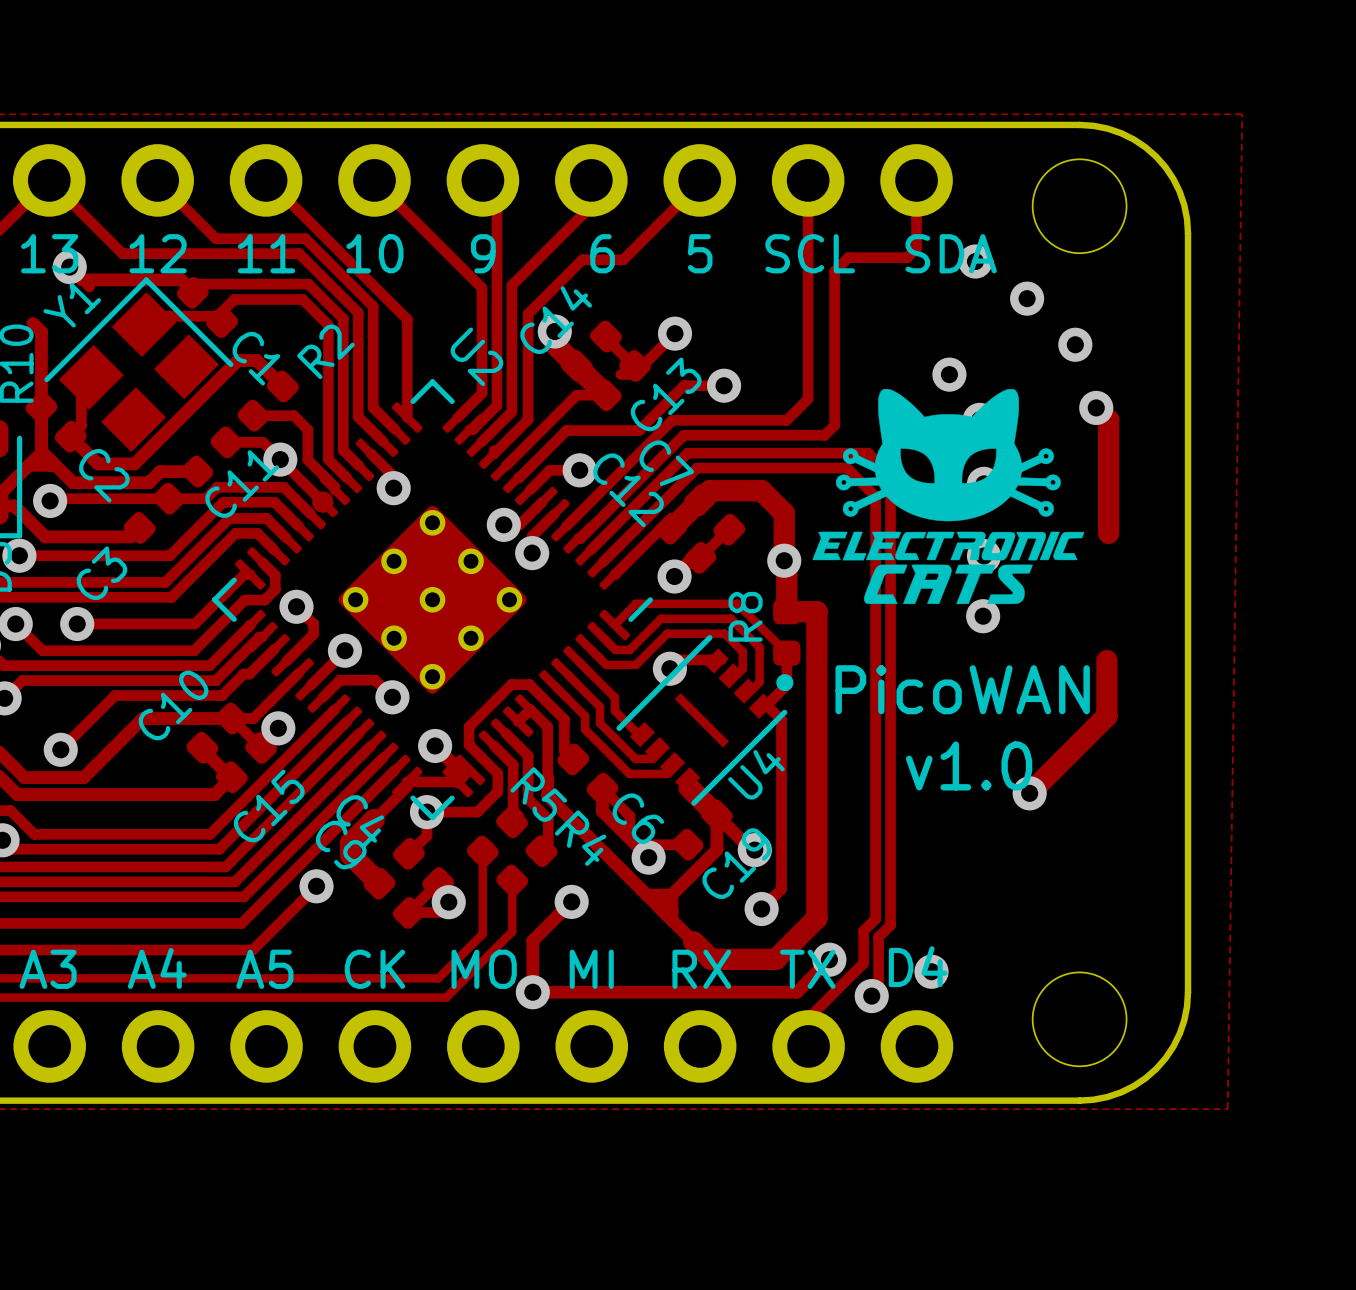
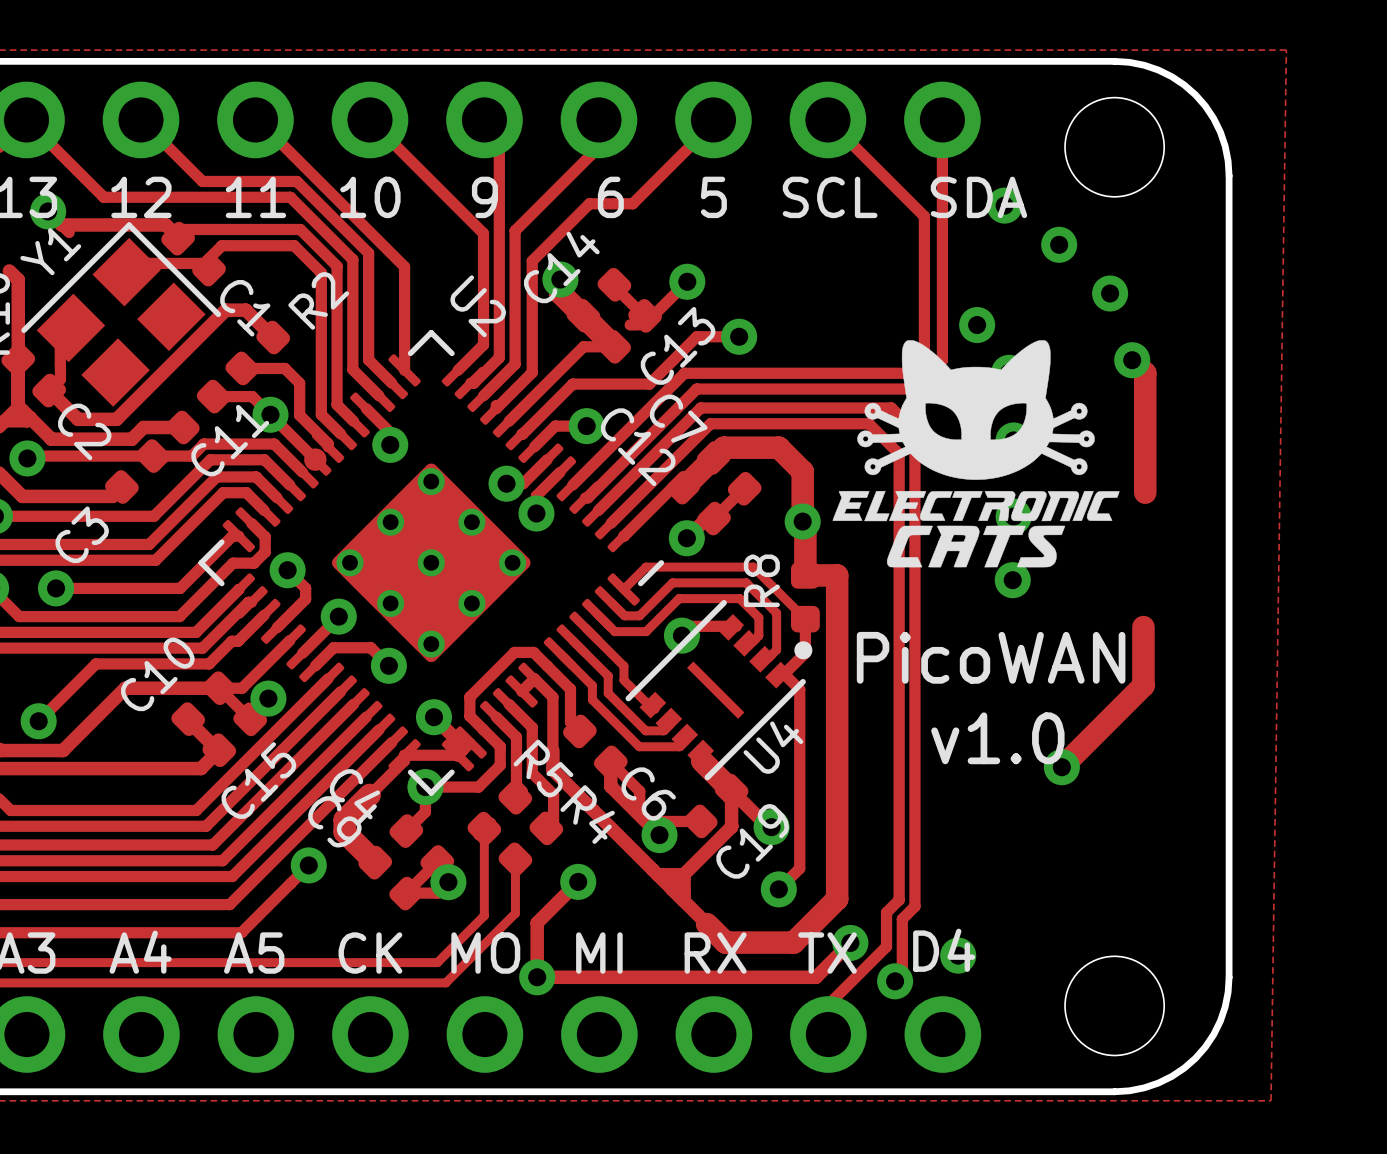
track: (808, 180) (808, 398) (786, 420) -> (827, 119) (924, 216) (924, 354) (905, 373) (805, 373)
track: (916, 248) (907, 257) (848, 257) (834, 271) (834, 425) (824, 435) -> (942, 191) (942, 360) (913, 389) (845, 389)

